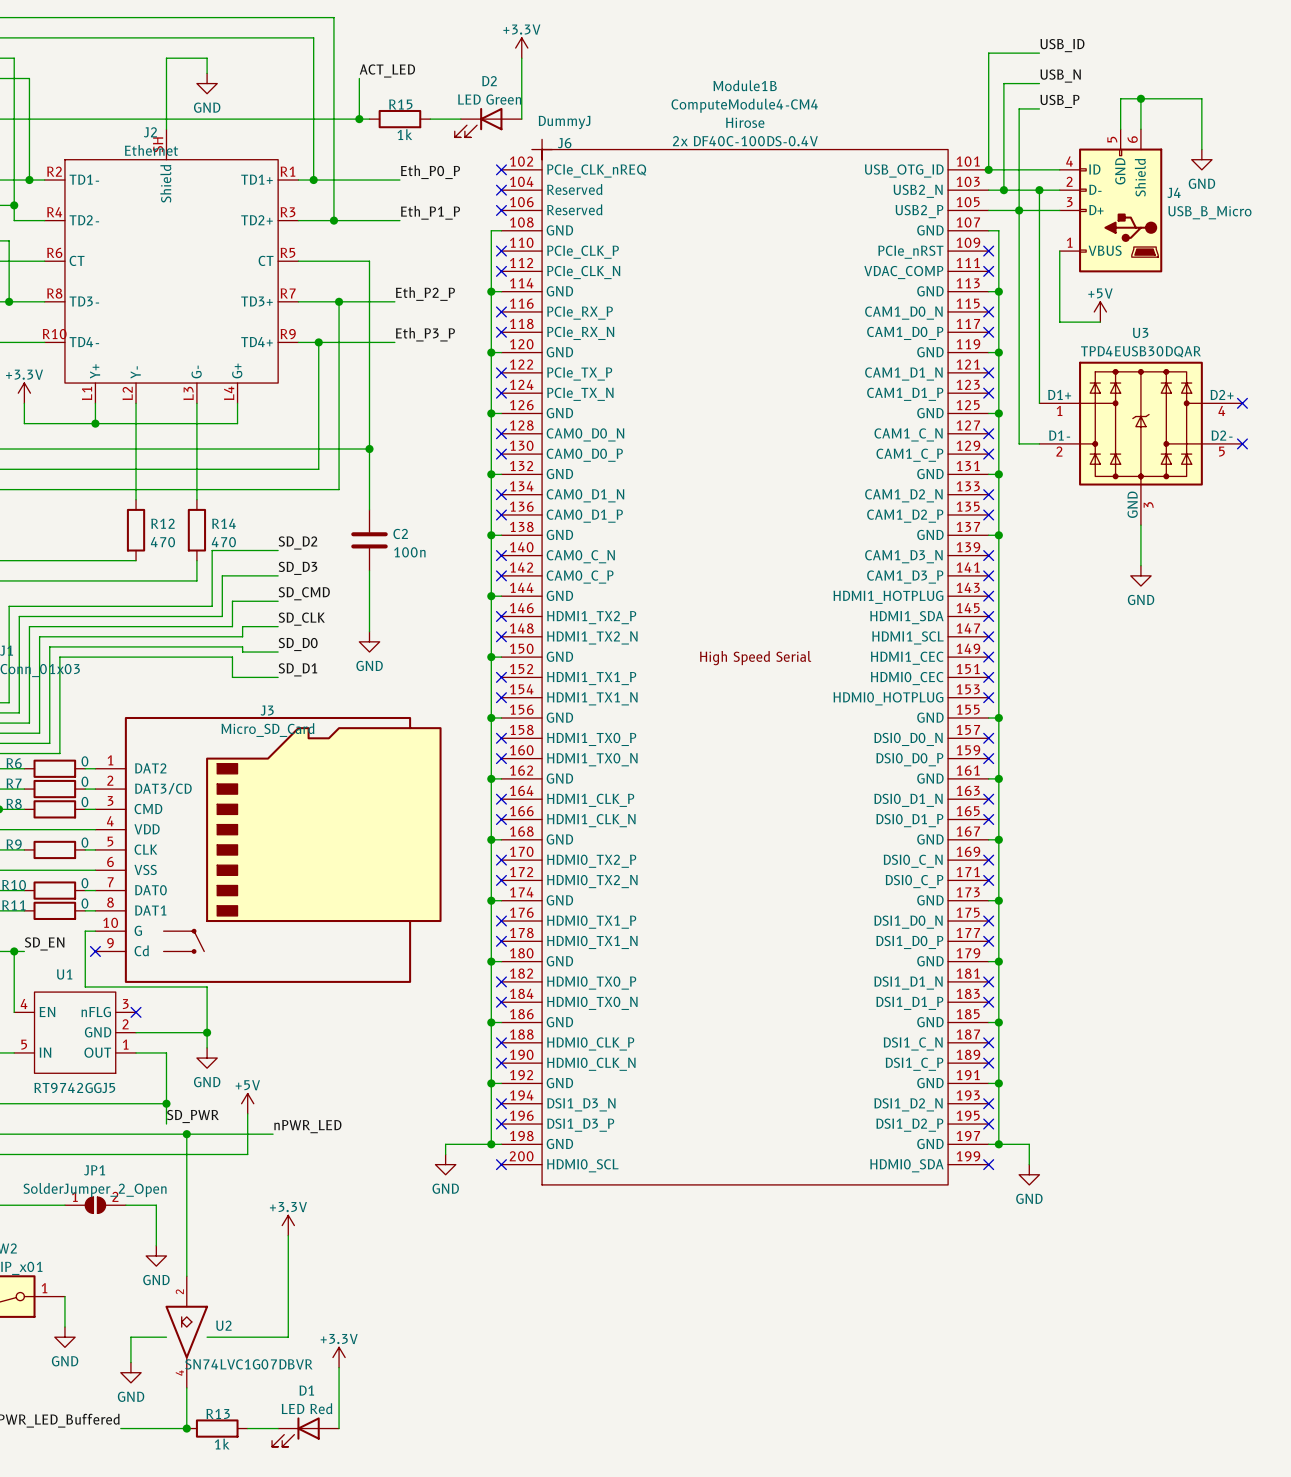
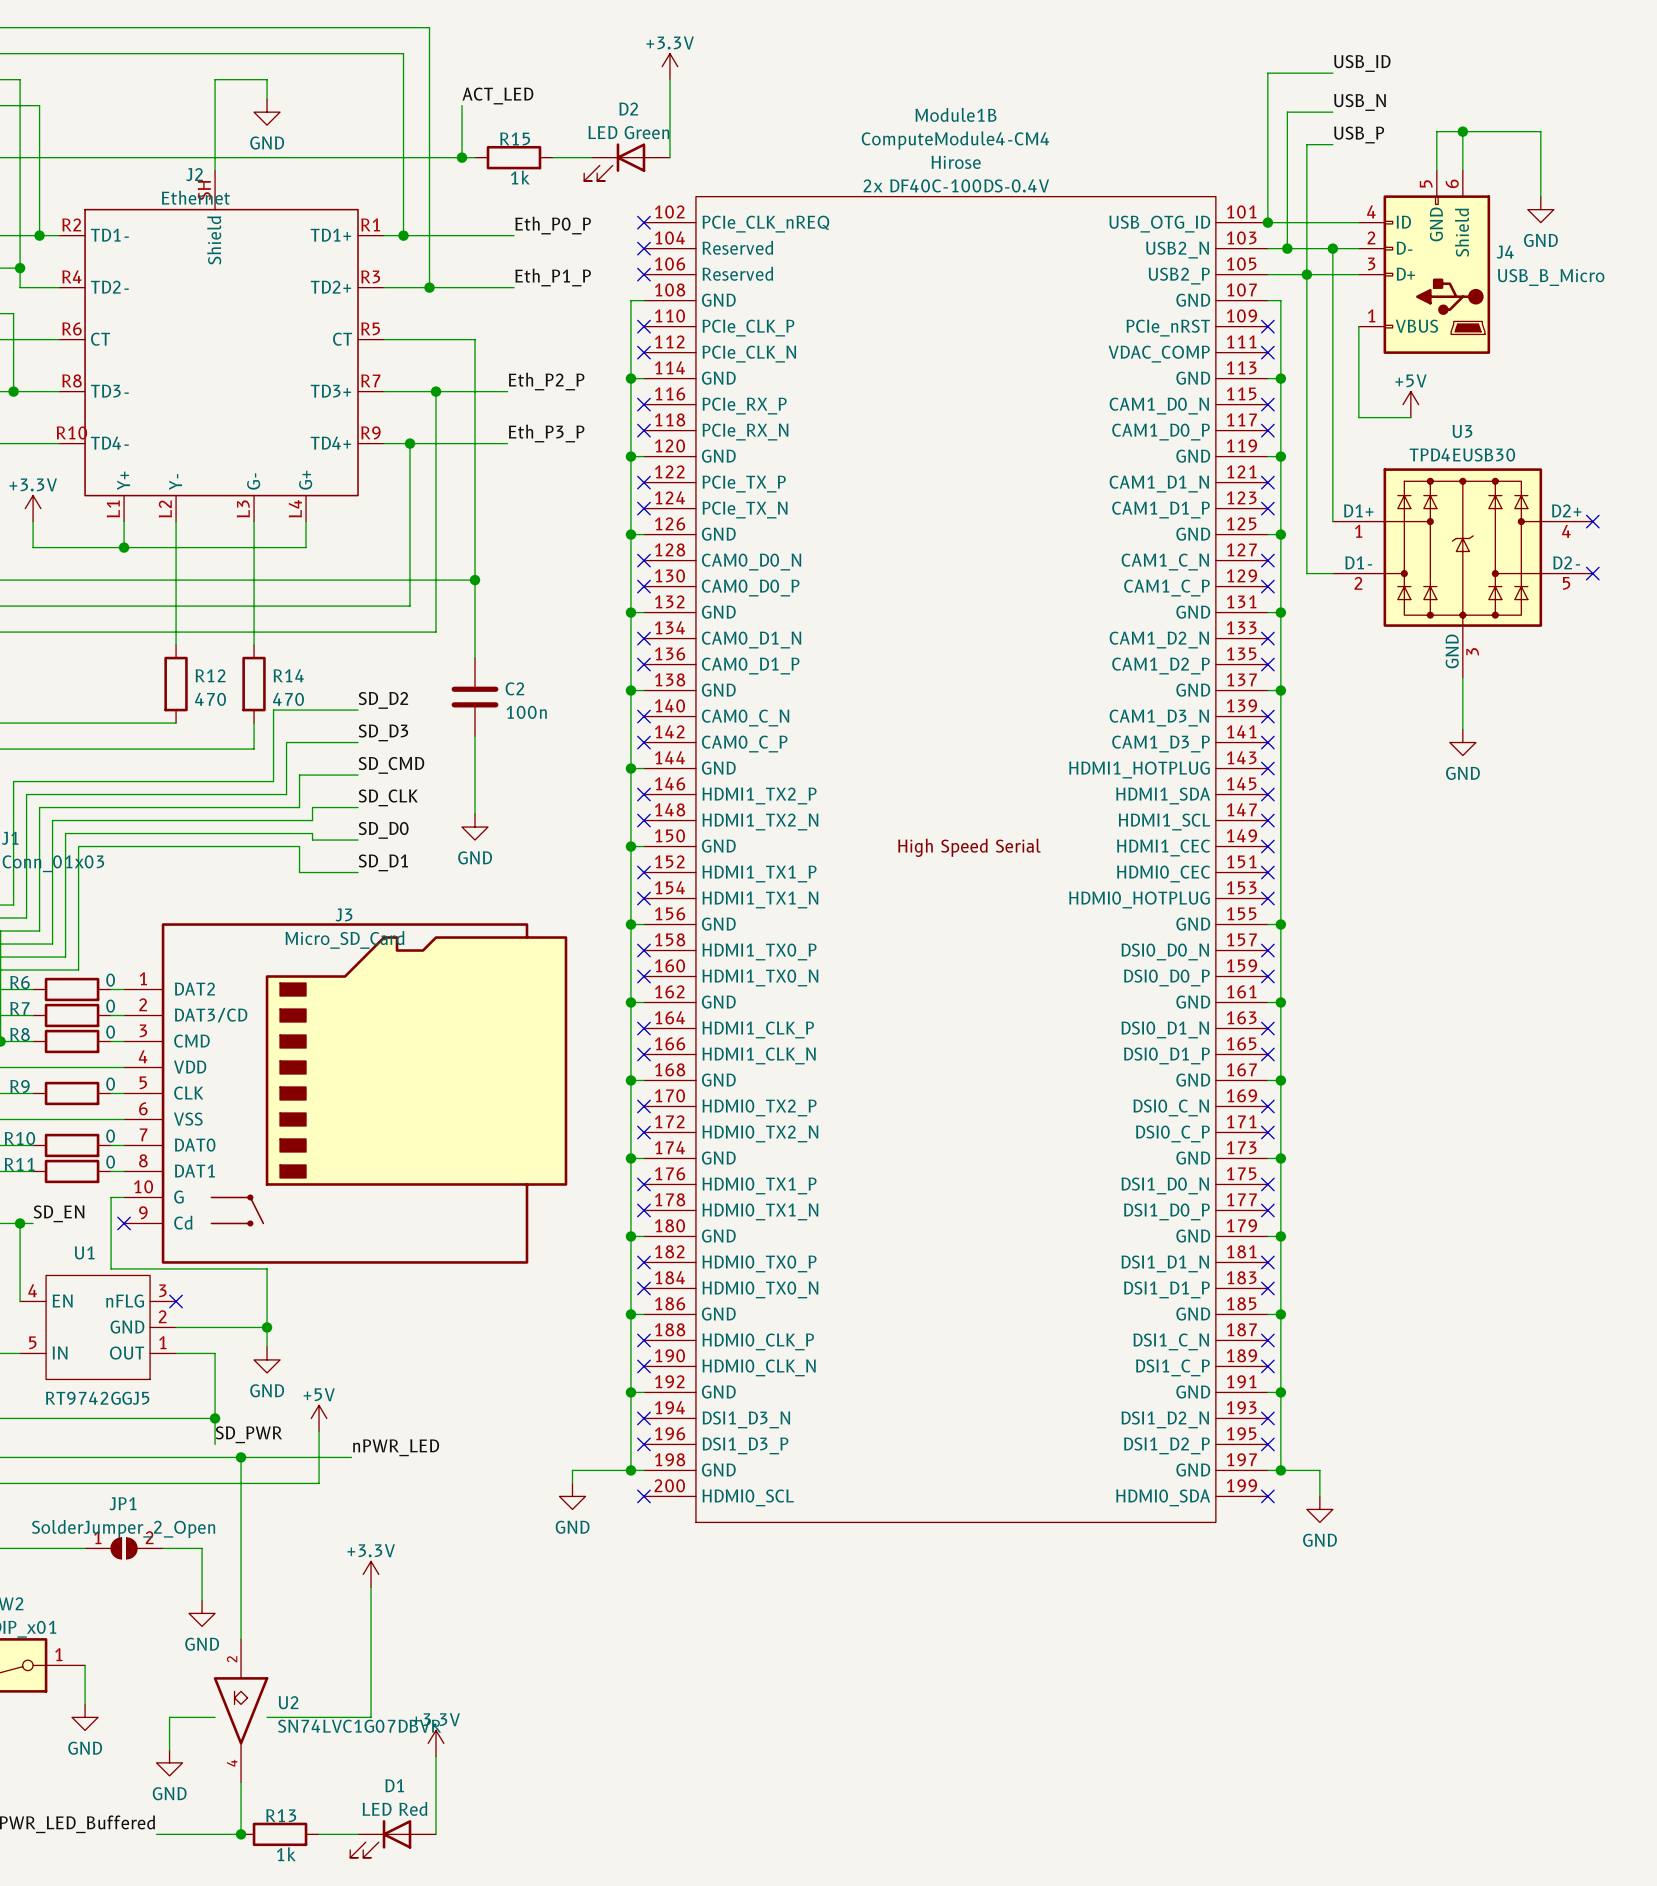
J6: DummyJ (542, 149) -> none
U3 value: TPD4EUSB30DQAR (1140, 351) -> TPD4EUSB30 (1462, 454)
U2 value position: SN74LVC1G07DBVR (248, 1364) -> SN74LVC1G07DBVR (359, 1726)

